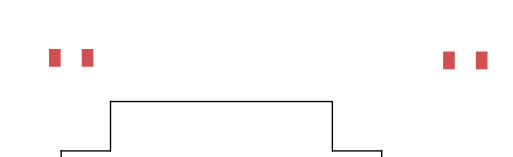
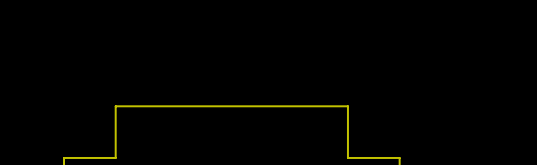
part: (71, 57) -> none
part: (465, 60) -> none

